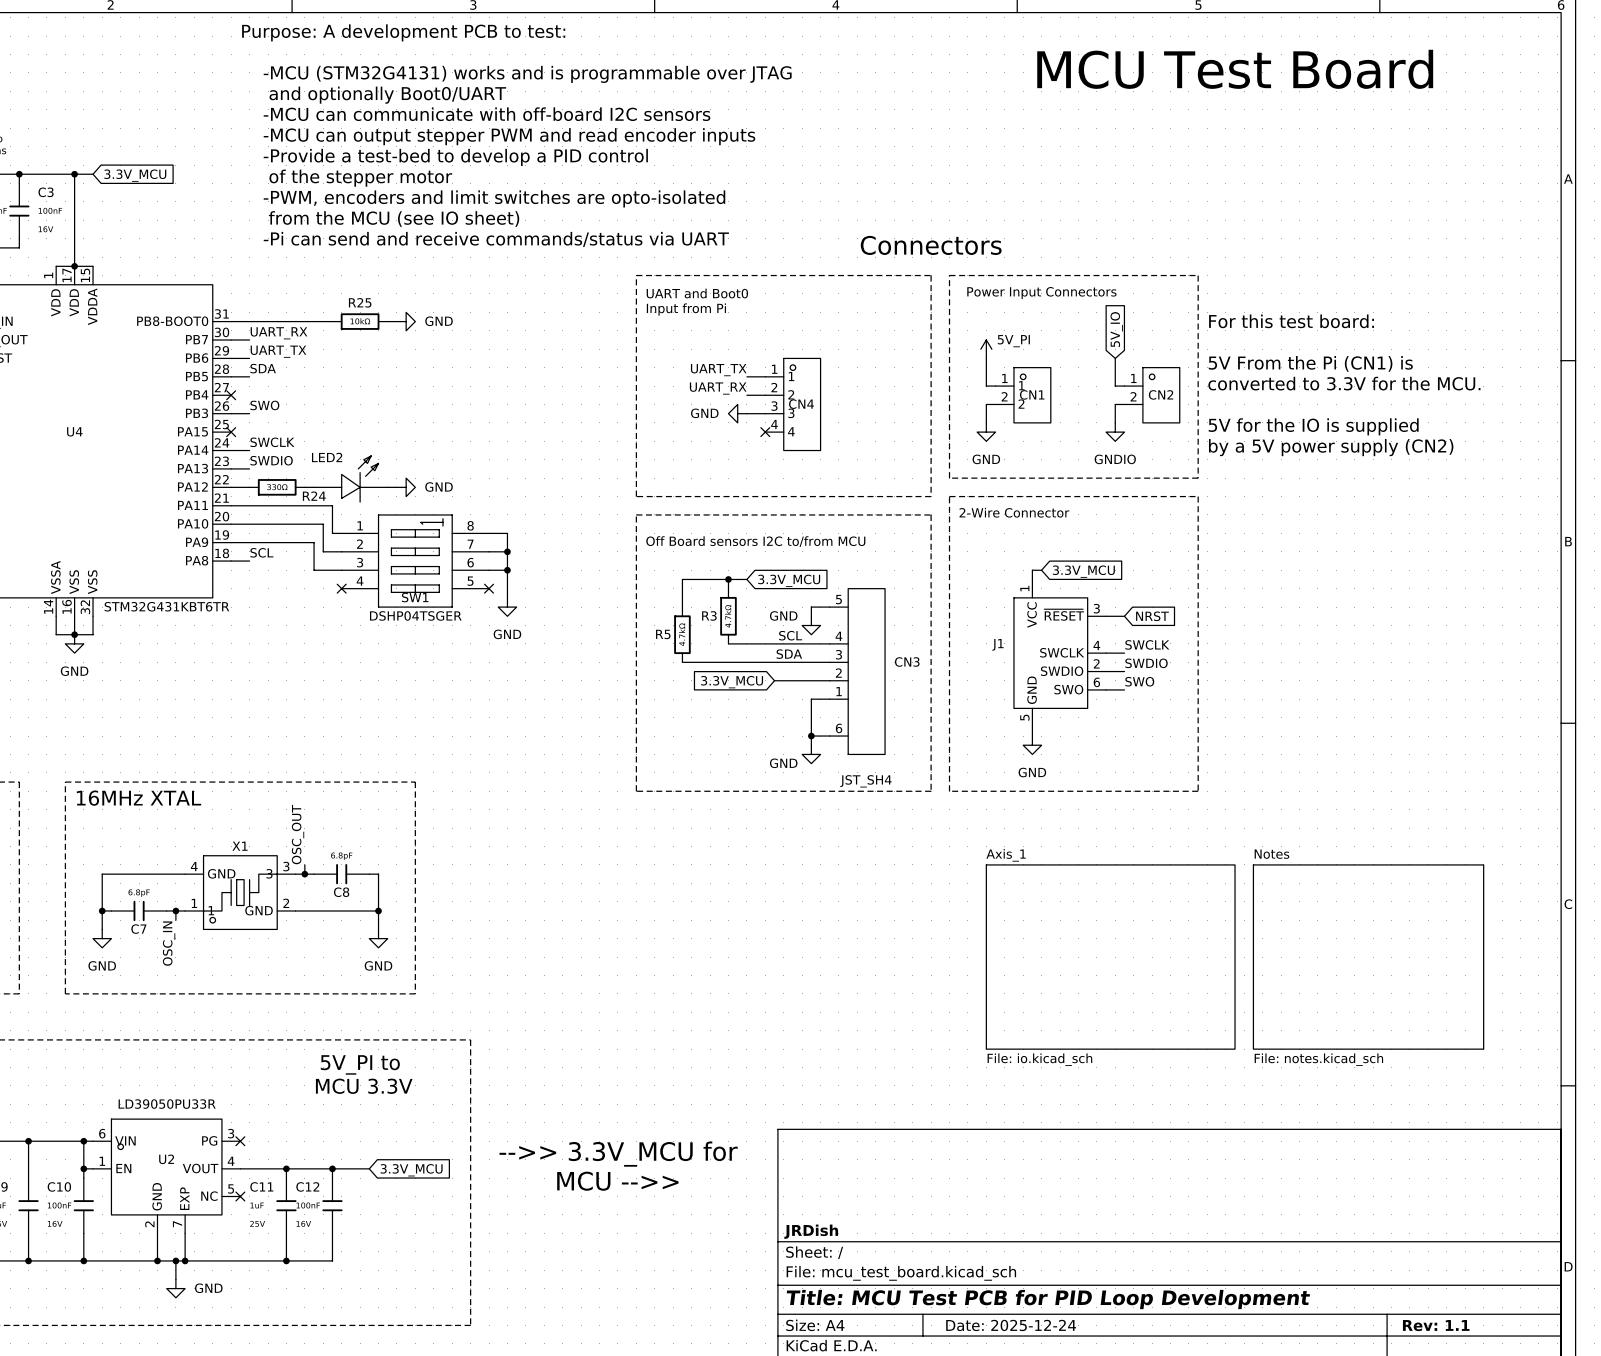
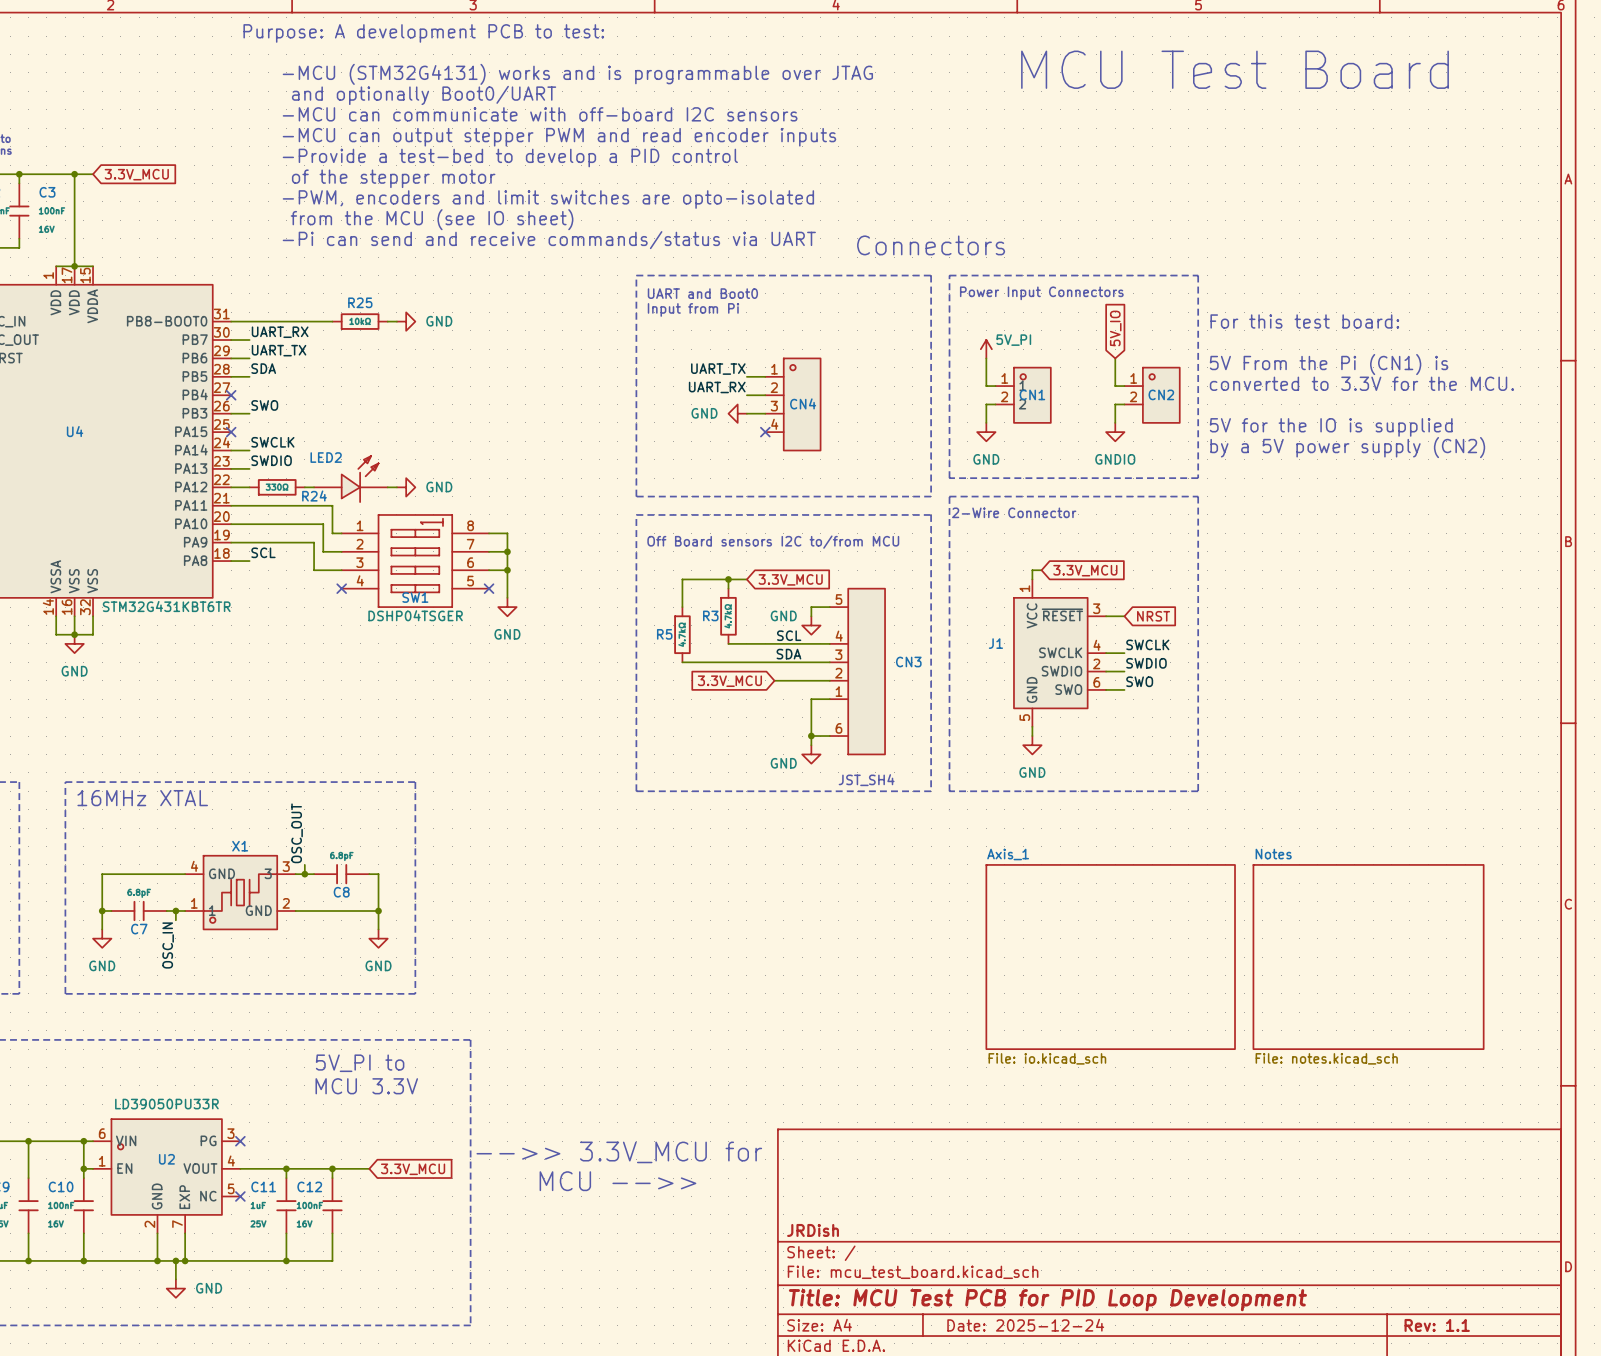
CN4 pin name: 1 (791, 376) -> none
CN4 pin name: 2 (791, 394) -> none
CN4 pin name: 3 (791, 413) -> none
CN4 pin name: 4 (791, 431) -> none

